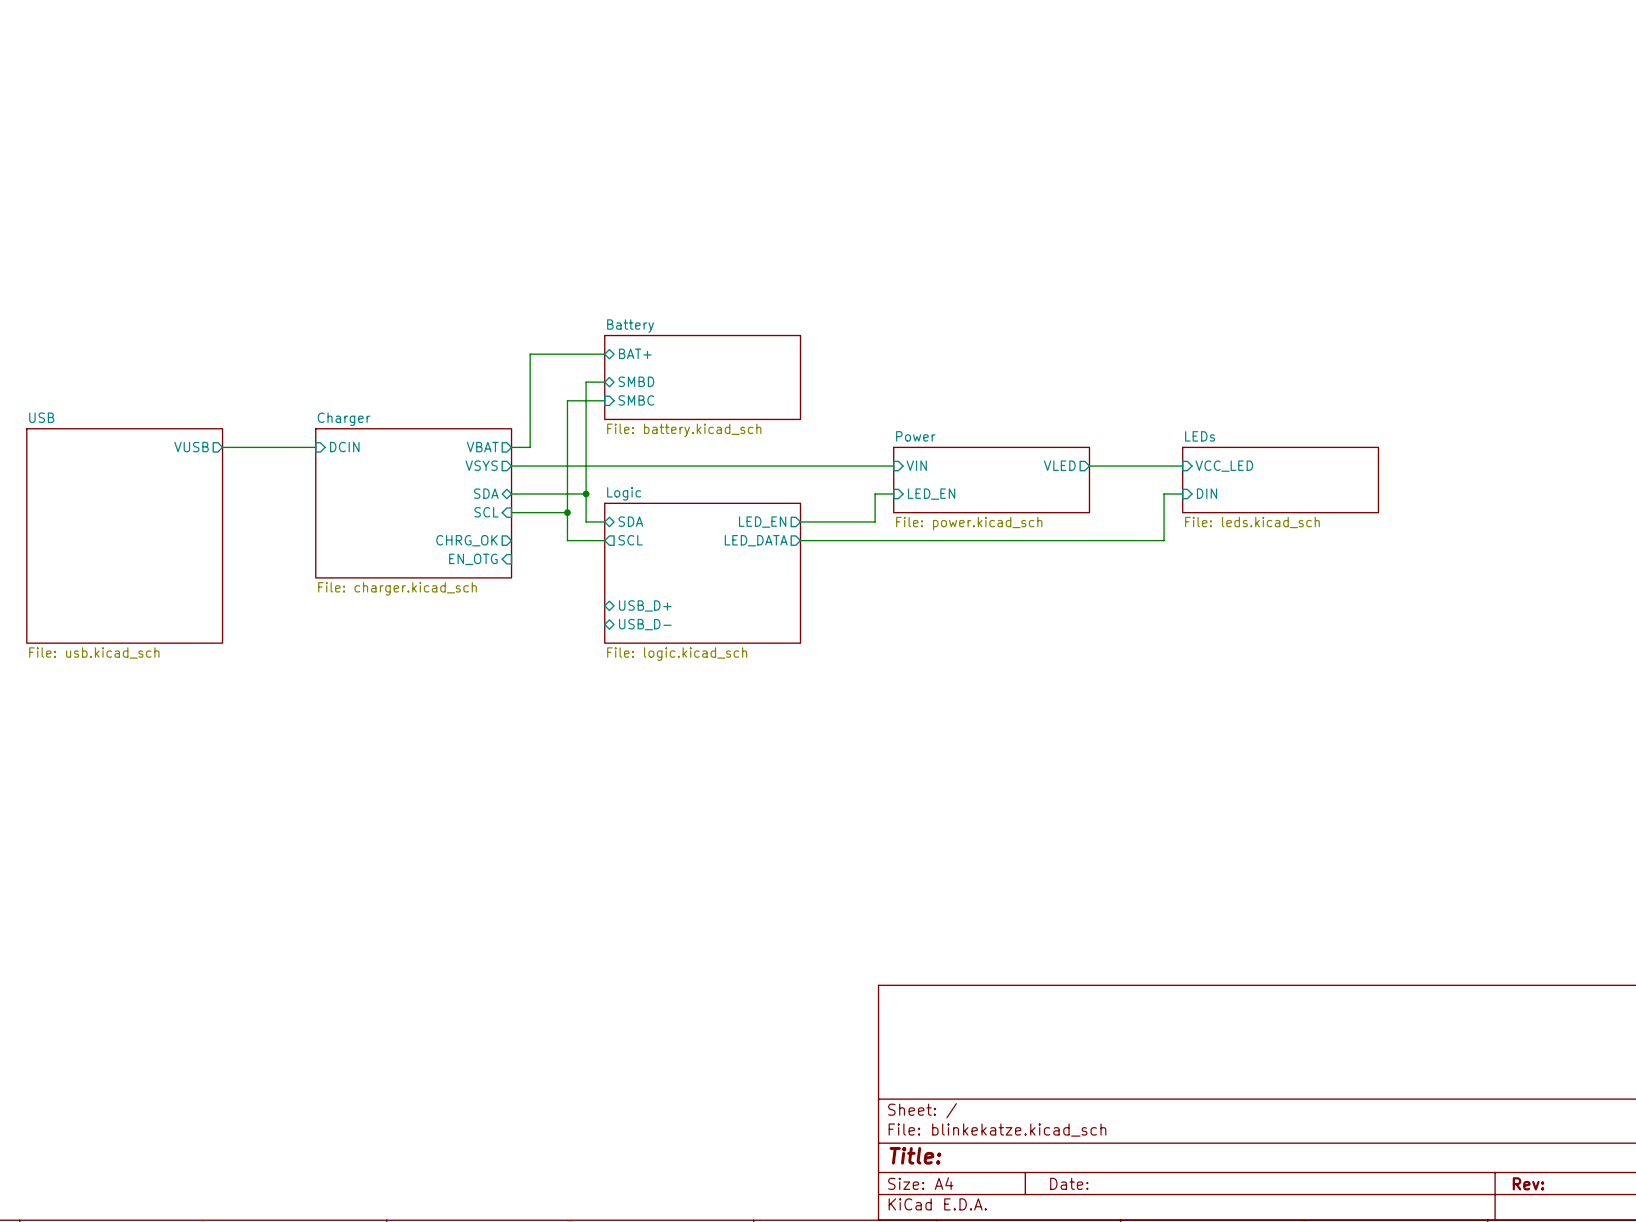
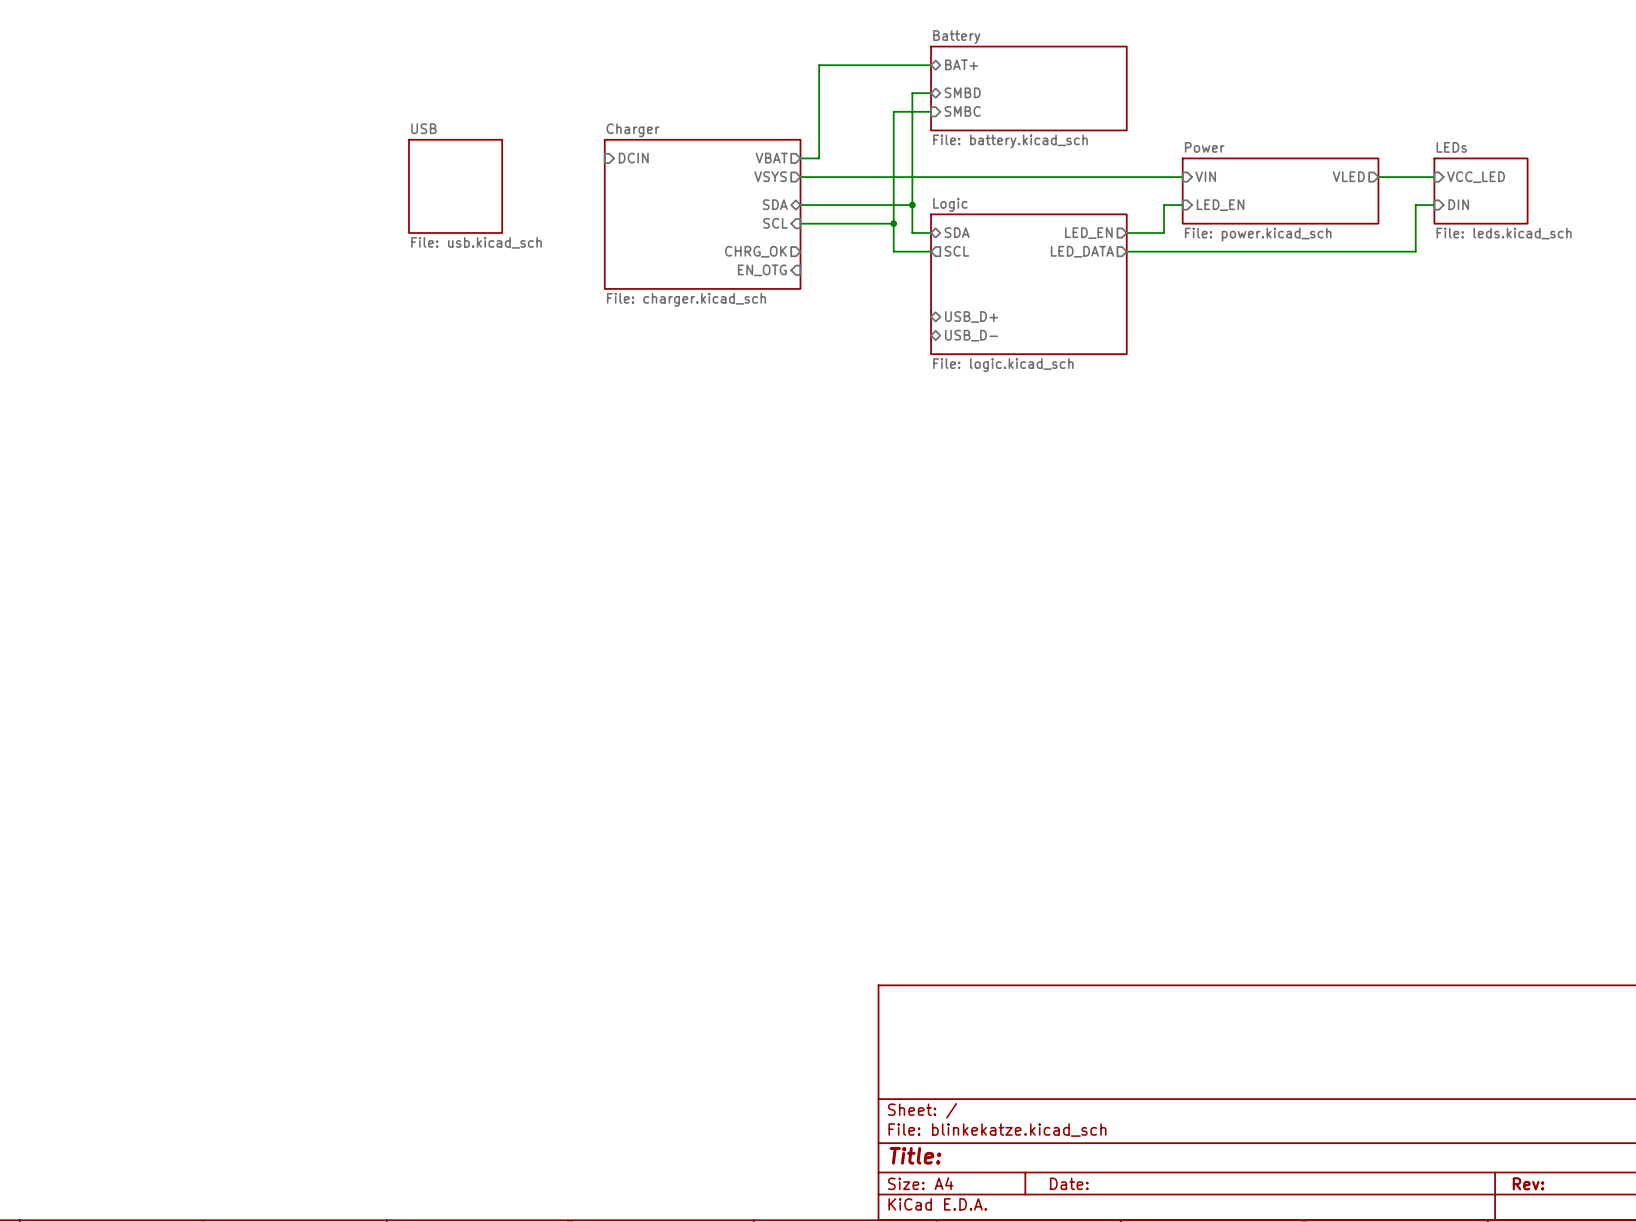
sheet pin: none -> BAT+ (961, 64)
wire: none -> (931, 65) (819, 65) (819, 158) (800, 158)
sheet Battery: none -> File: battery.kicad_sch (1028, 88)
sheet pin: none -> SMBD (962, 92)
wire: none -> (931, 93) (912, 93) (912, 232) (931, 232)
wire: none -> (931, 111) (893, 111) (893, 251) (931, 251)
sheet pin: none -> SMBC (962, 111)
sheet pin: none -> DCIN (633, 158)
sheet pin: none -> VBAT (771, 158)
sheet pin: none -> VSYS (770, 176)
sheet pin: none -> VIN (1205, 176)
sheet pin: none -> VLED (1348, 176)
wire: none -> (800, 177) (1182, 177)
wire: none -> (1378, 177) (1434, 177)
sheet pin: none -> VCC_LED (1476, 177)
sheet USB: none -> File: usb.kicad_sch (455, 186)
sheet Power: none -> File: power.kicad_sch (1280, 191)
sheet LEDs: none -> File: leds.kicad_sch (1480, 191)
sheet pin: none -> SDA (775, 204)
sheet pin: none -> DIN (1458, 204)
wire: none -> (800, 205) (912, 205)
junction: none -> (912, 205)
wire: none -> (1182, 205) (1164, 205) (1164, 232) (1126, 232)
sheet pin: none -> LED_EN (1220, 205)
wire: none -> (1434, 205) (1415, 205) (1415, 251) (1126, 251)
sheet Charger: none -> File: charger.kicad_sch (702, 214)
sheet pin: none -> SCL (775, 223)
wire: none -> (800, 223) (893, 223)
junction: none -> (893, 223)
sheet pin: none -> SDA (957, 232)
sheet pin: none -> LED_EN (1088, 233)
sheet pin: none -> CHRG_OK (755, 251)
sheet pin: none -> SCL (956, 251)
sheet pin: none -> LED_DATA (1082, 251)
sheet pin: none -> EN_OTG (762, 270)
sheet Logic: none -> File: logic.kicad_sch (1028, 284)
sheet pin: none -> USB_D+ (971, 316)
sheet pin: none -> USB_D- (971, 335)
sheet pin: BAT+ (635, 353) -> none
wire: (604, 354) (530, 354) (530, 447) (511, 447) -> none
sheet Battery: File: battery.kicad_sch (702, 377) -> none
sheet pin: SMBD (636, 381) -> none
wire: (604, 382) (586, 382) (586, 521) (604, 521) -> none
wire: (604, 400) (567, 400) (567, 540) (604, 540) -> none
sheet pin: SMBC (636, 400) -> none
sheet pin: VUSB (191, 447) -> none
wire: (222, 447) (315, 447) -> none
sheet pin: DCIN (344, 447) -> none
sheet pin: VBAT (482, 447) -> none
sheet pin: VSYS (481, 465) -> none
sheet pin: VIN (916, 465) -> none
sheet pin: VLED (1059, 465) -> none
wire: (511, 466) (893, 466) -> none
wire: (1089, 466) (1182, 466) -> none
sheet pin: VCC_LED (1224, 466) -> none
sheet Power: File: power.kicad_sch (991, 480) -> none
sheet LEDs: File: leds.kicad_sch (1280, 480) -> none
sheet pin: SDA (486, 493) -> none
sheet pin: DIN (1207, 493) -> none
wire: (511, 494) (586, 494) -> none
junction: (586, 494) -> none
wire: (893, 494) (875, 494) (875, 521) (800, 521) -> none
sheet pin: LED_EN (931, 494) -> none
wire: (1182, 494) (1164, 494) (1164, 540) (800, 540) -> none
sheet Charger: File: charger.kicad_sch (413, 503) -> none
sheet pin: SCL (486, 512) -> none
wire: (511, 512) (567, 512) -> none
junction: (567, 512) -> none
sheet pin: SDA (630, 521) -> none
sheet pin: LED_EN (762, 522) -> none
sheet USB: File: usb.kicad_sch (124, 535) -> none
sheet pin: CHRG_OK (466, 540) -> none
sheet pin: SCL (630, 540) -> none
sheet pin: LED_DATA (756, 540) -> none
sheet pin: EN_OTG (473, 559) -> none
sheet Logic: File: logic.kicad_sch (702, 573) -> none
sheet pin: USB_D+ (645, 605) -> none
sheet pin: USB_D- (645, 624) -> none

